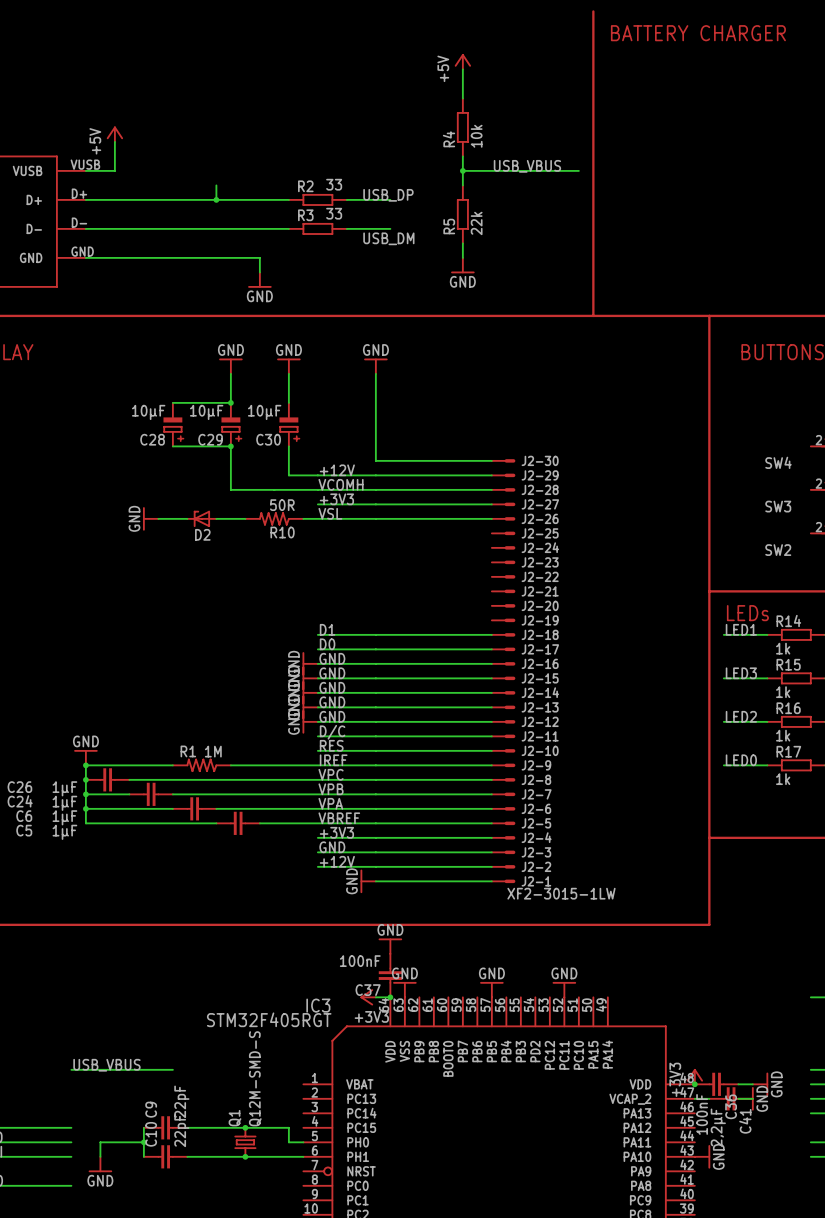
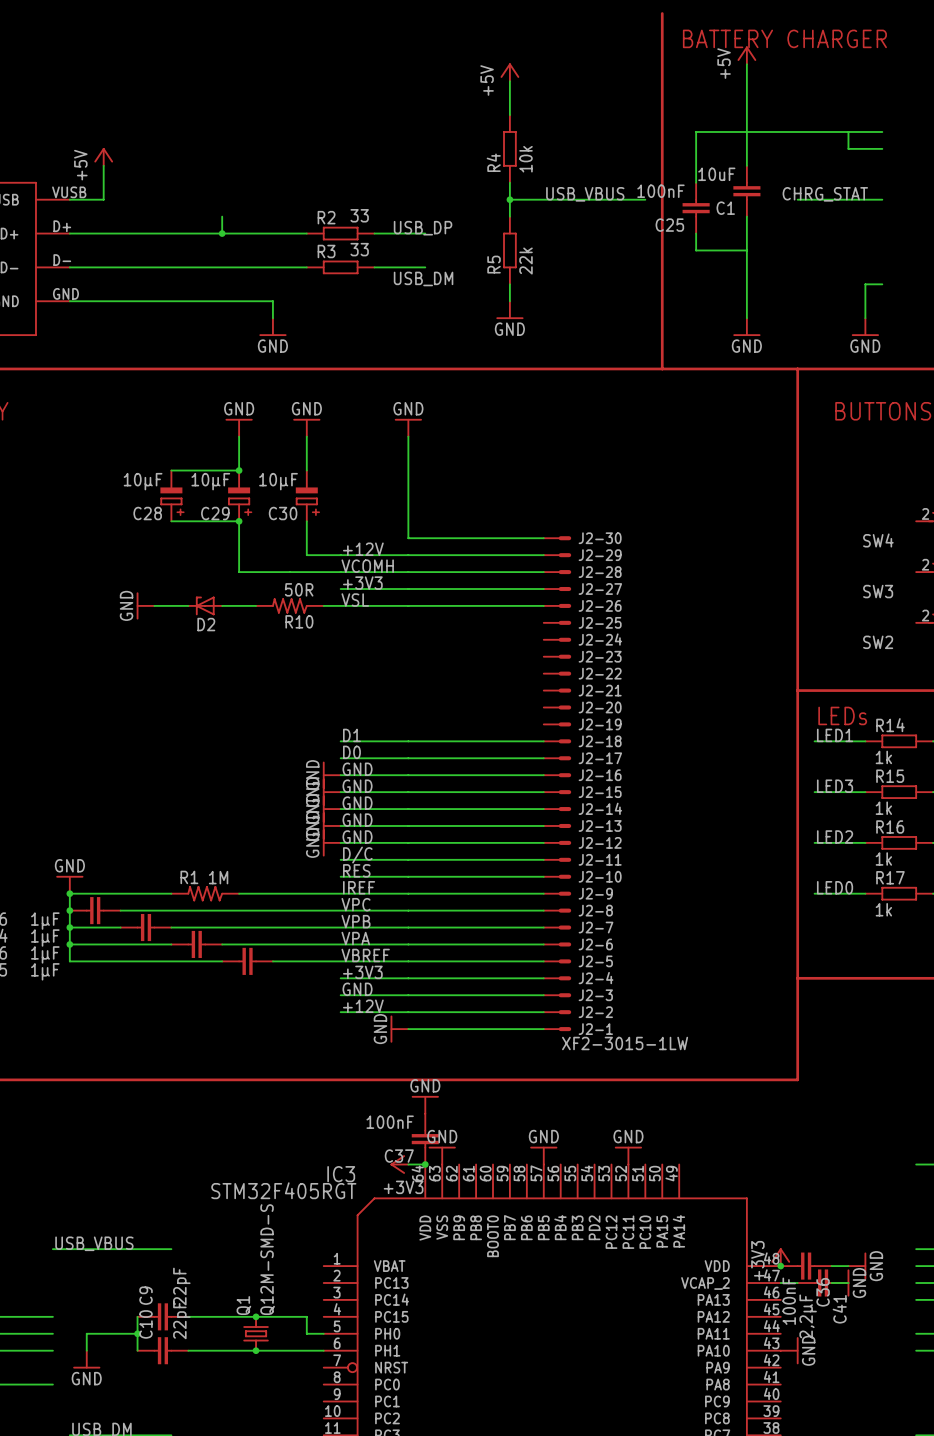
power symbol: none -> +5V (746, 55)
wire: none -> (746, 64) (746, 165)
wire: none -> (848, 131) (848, 148) (882, 148)
wire: none -> (882, 131) (696, 131) (696, 182)
C1: none -> 10uF (746, 191)
label: none -> CHRG_STAT (825, 194)
wire: none -> (797, 199) (882, 199)
C25: none -> 100nF (696, 208)
wire: none -> (746, 216) (746, 318)
wire: none -> (696, 233) (696, 250) (746, 250)
wire: none -> (882, 284) (865, 284) (865, 318)
power symbol: none -> GND (746, 327)
power symbol: none -> GND (865, 327)

